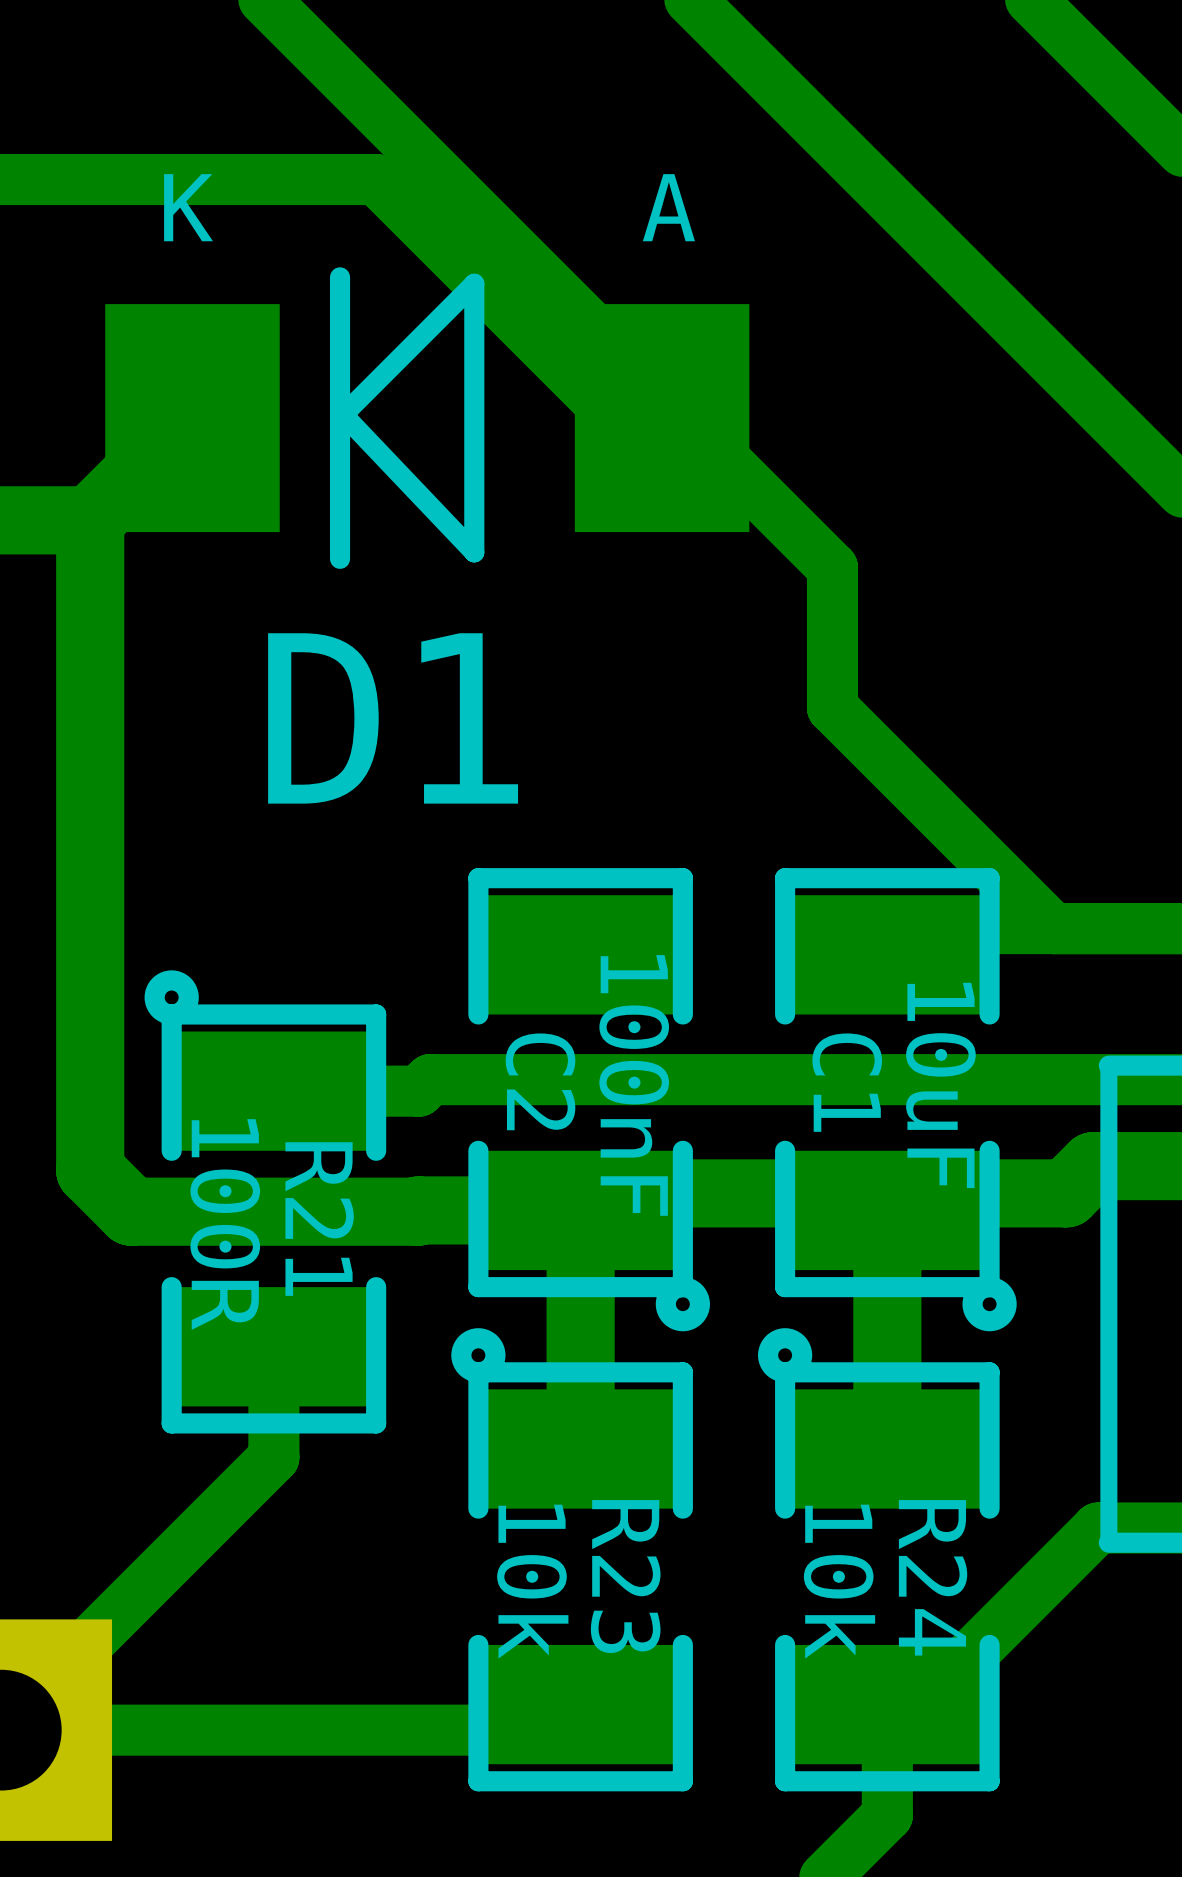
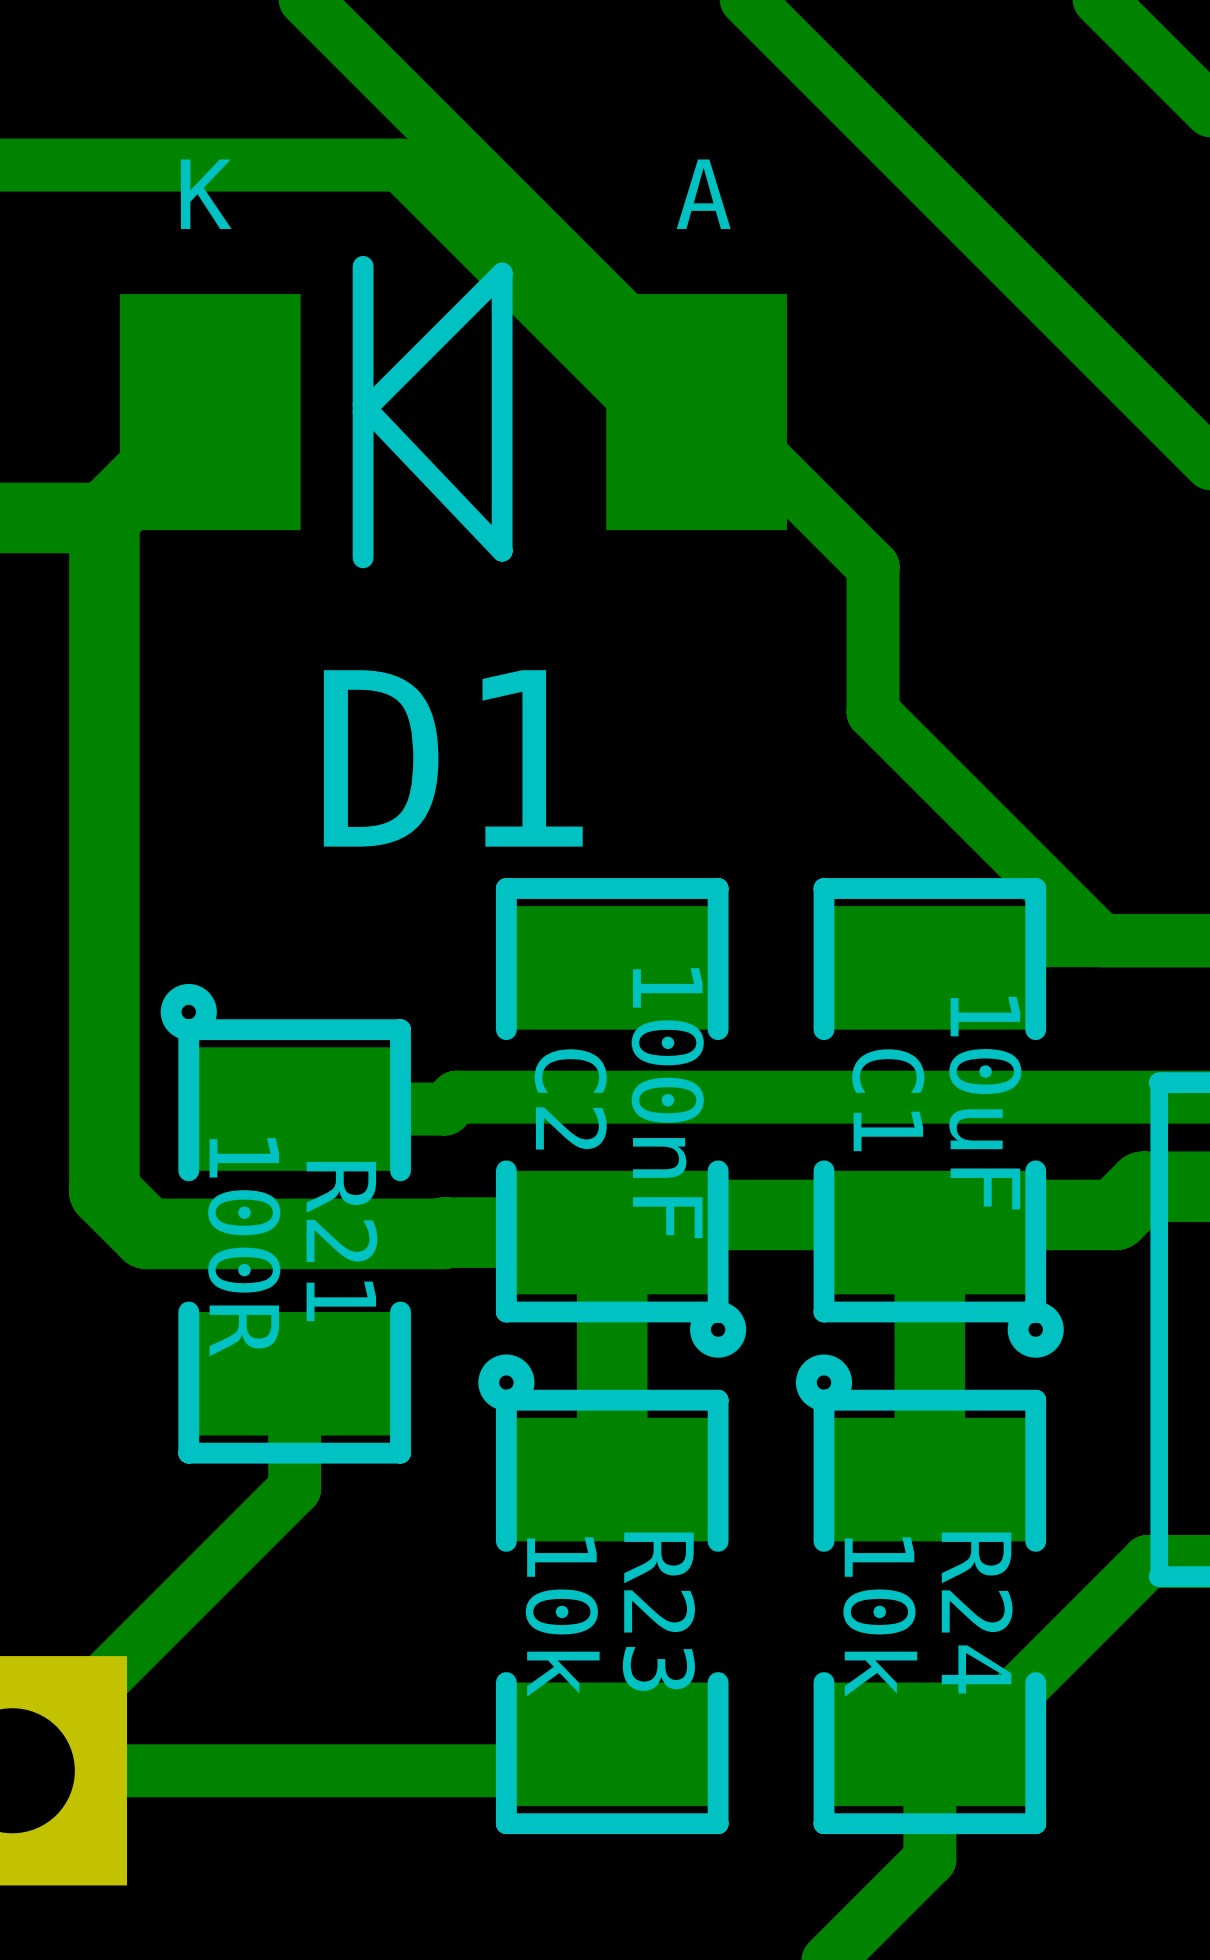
D1 name position: D1 (393, 718) -> D1 (453, 758)

